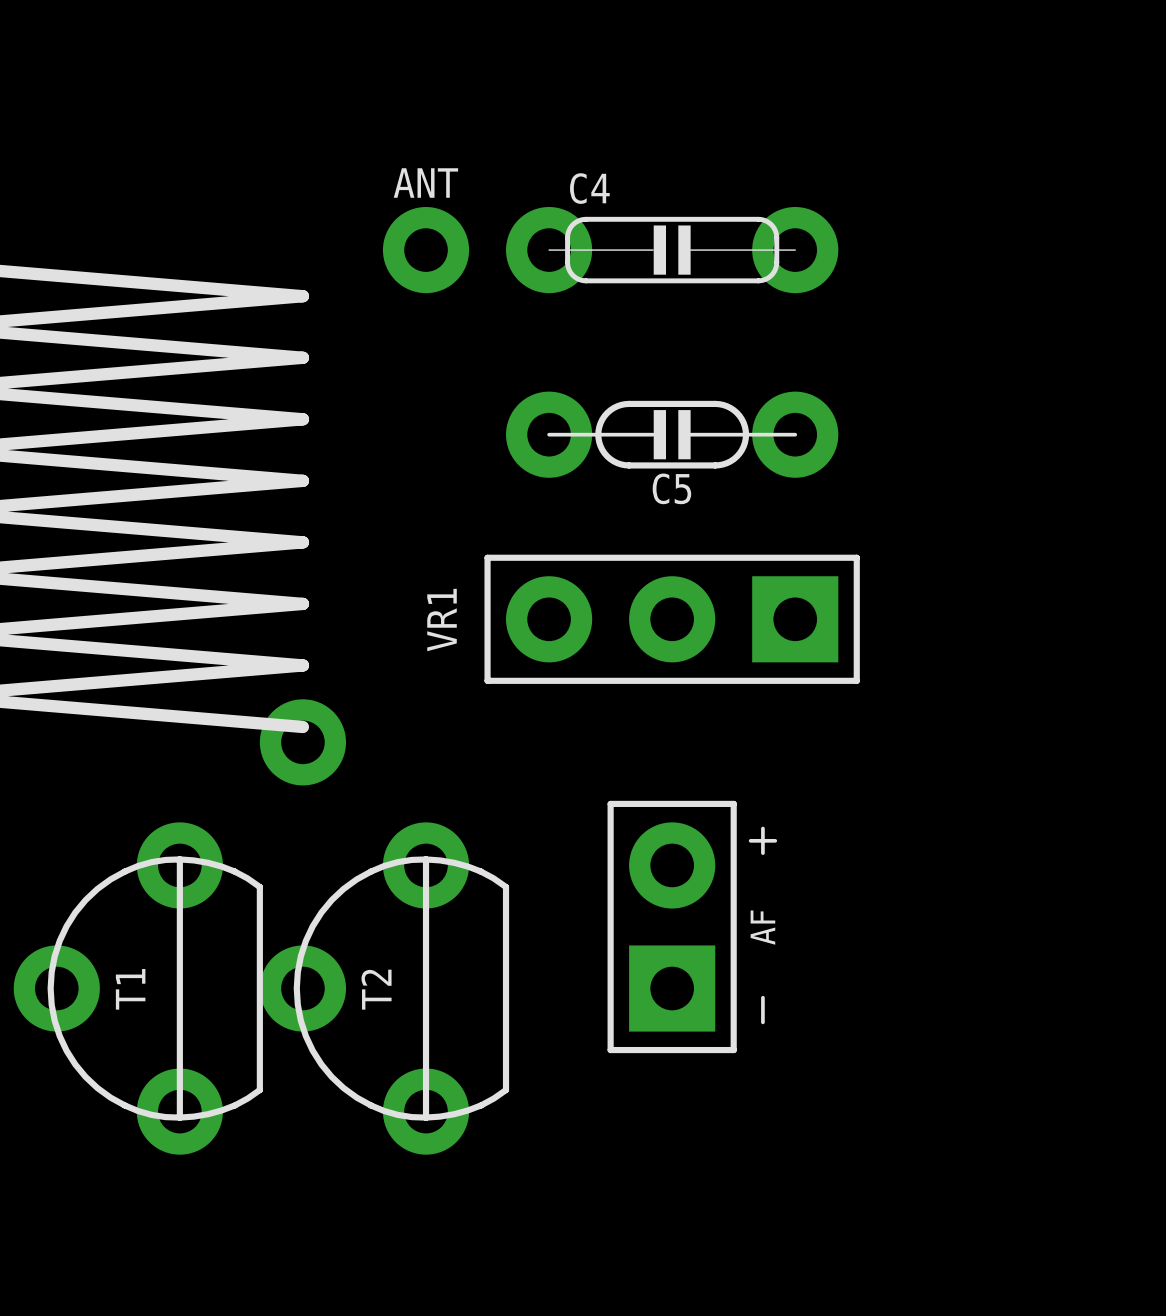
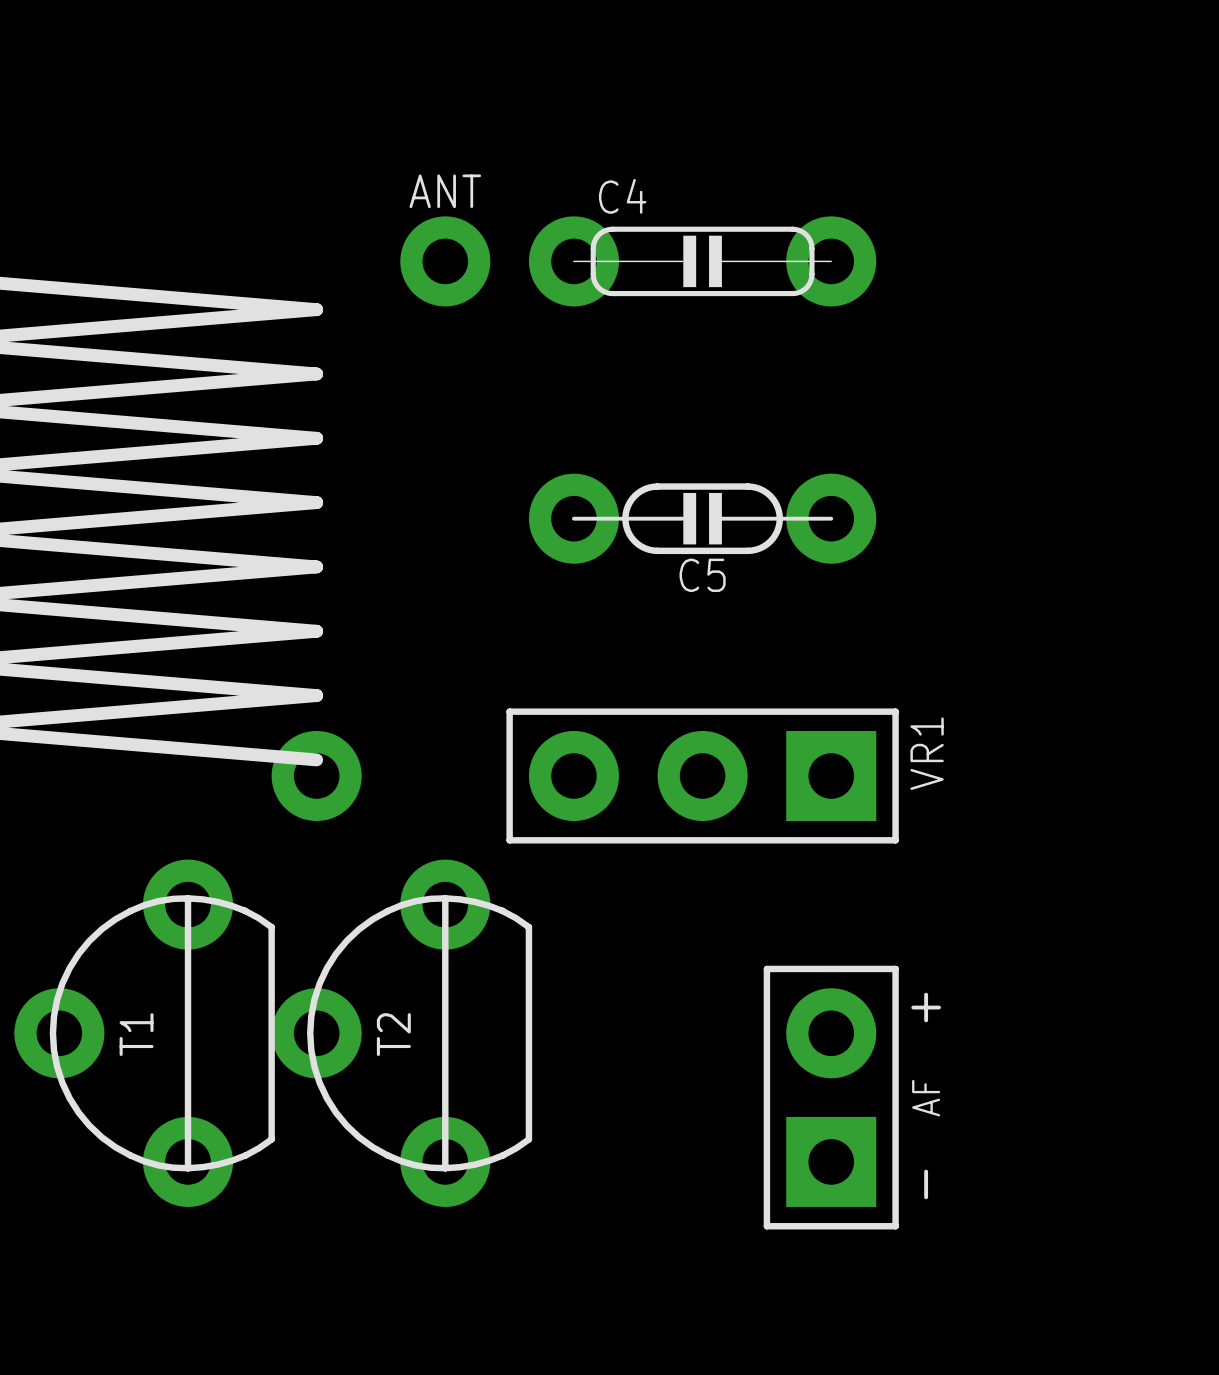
C5 position: (672, 434) -> (702, 518)
VR1 position: (672, 619) -> (702, 775)
VR1 name position: VR1 (442, 620) -> VR1 (927, 753)
AF position: (692, 926) -> (852, 1097)

